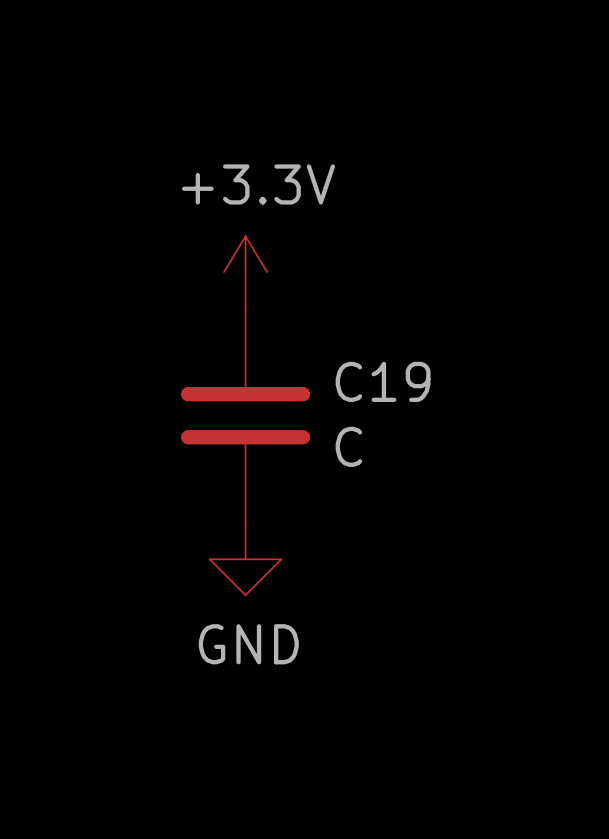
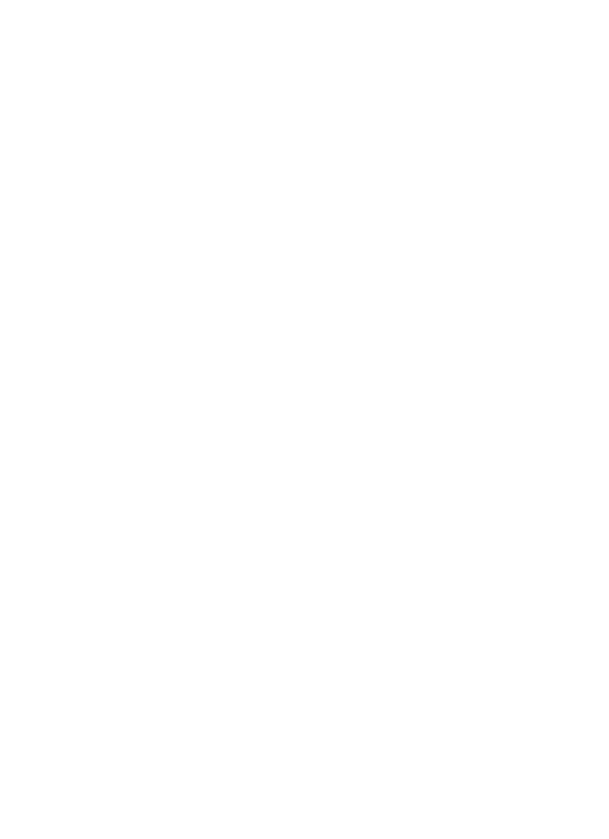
power symbol: +3.3V (245, 272) -> none
C19: C (245, 415) -> none
power symbol: GND (245, 559) -> none

